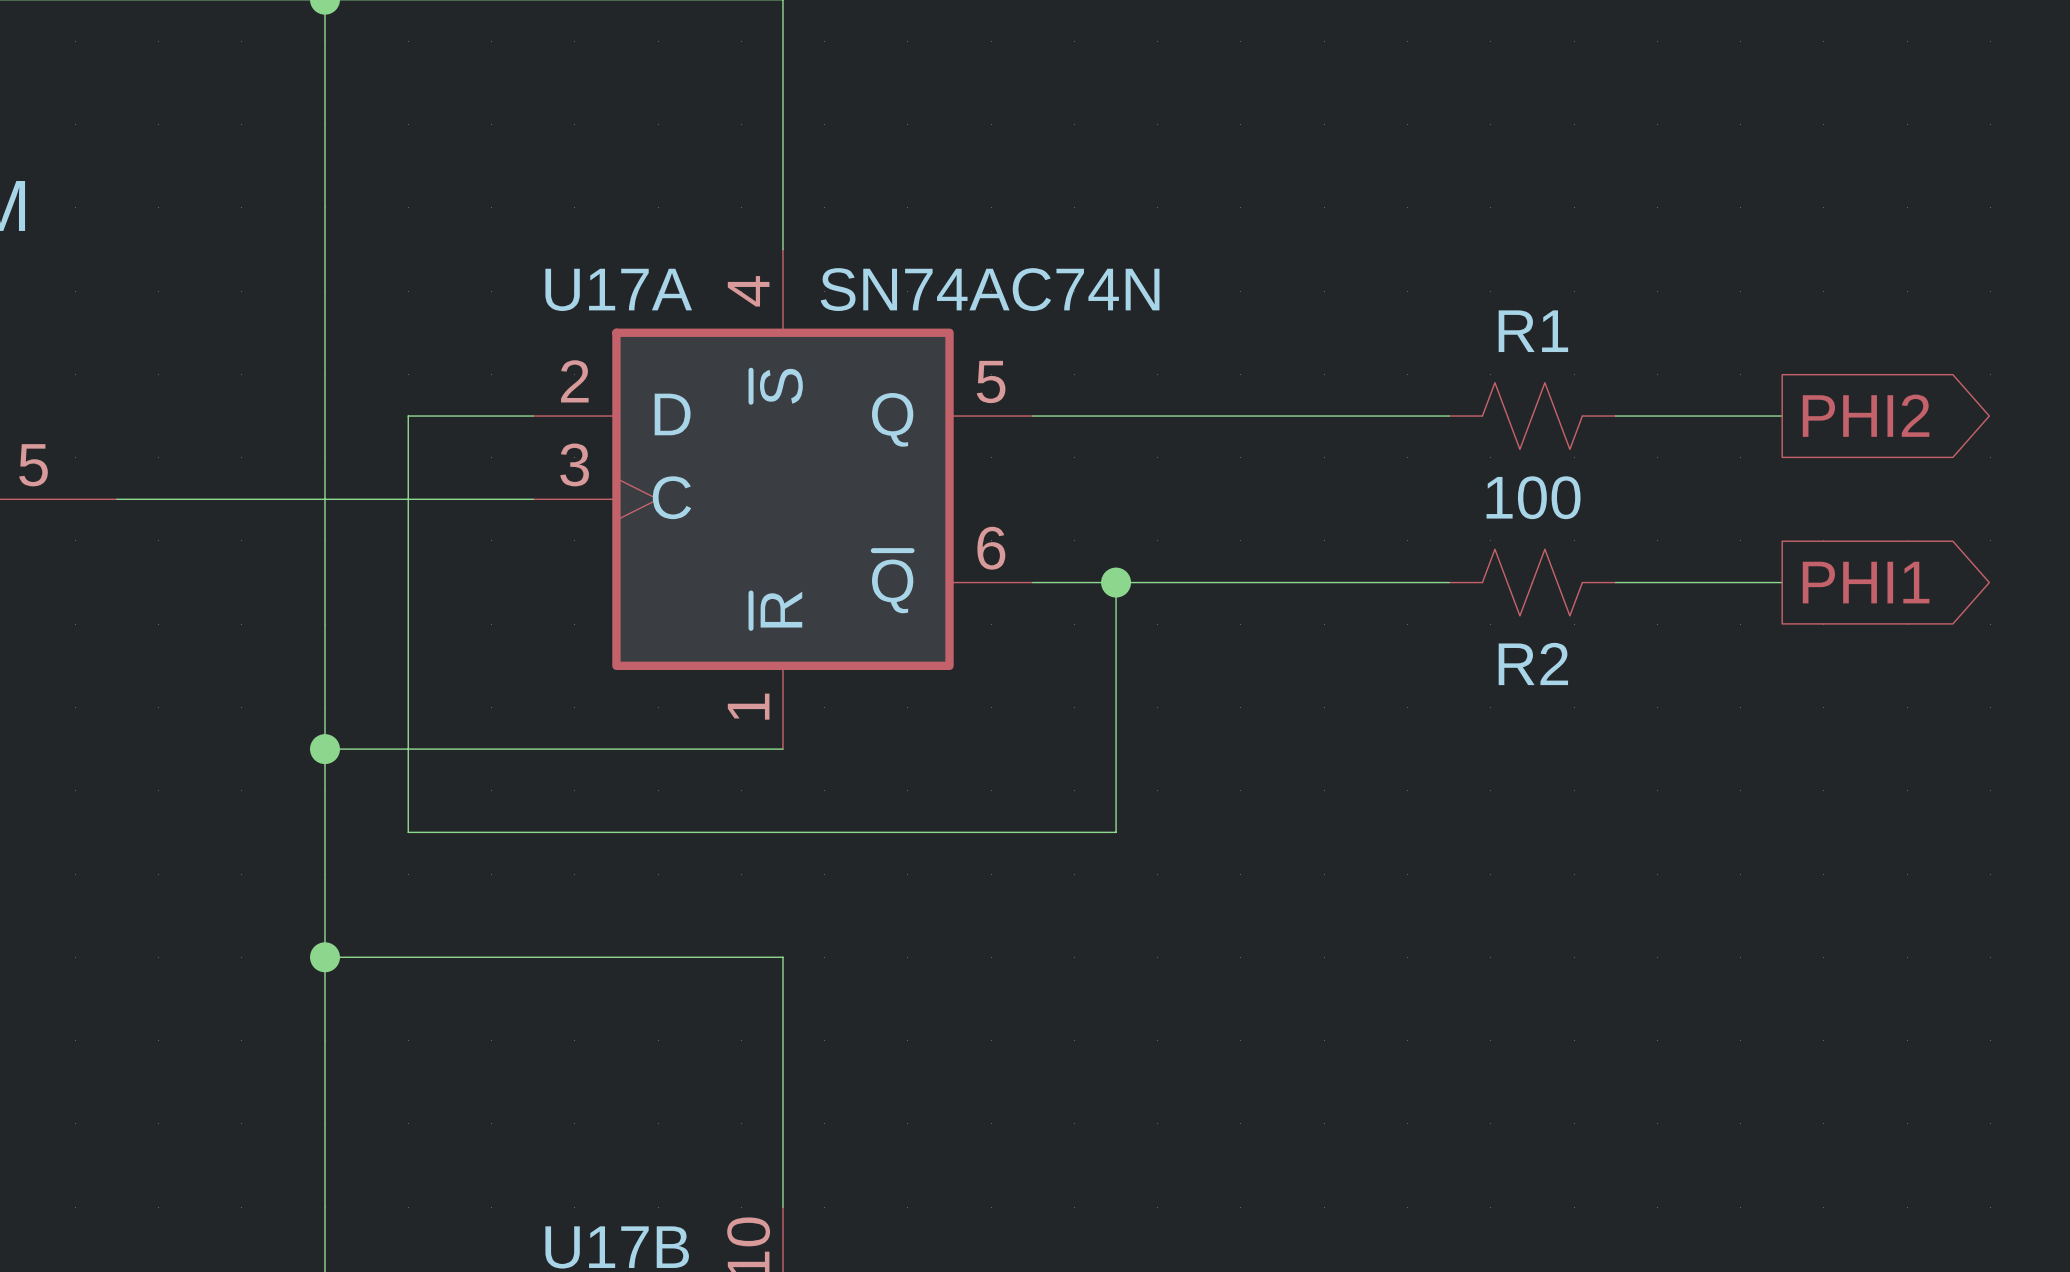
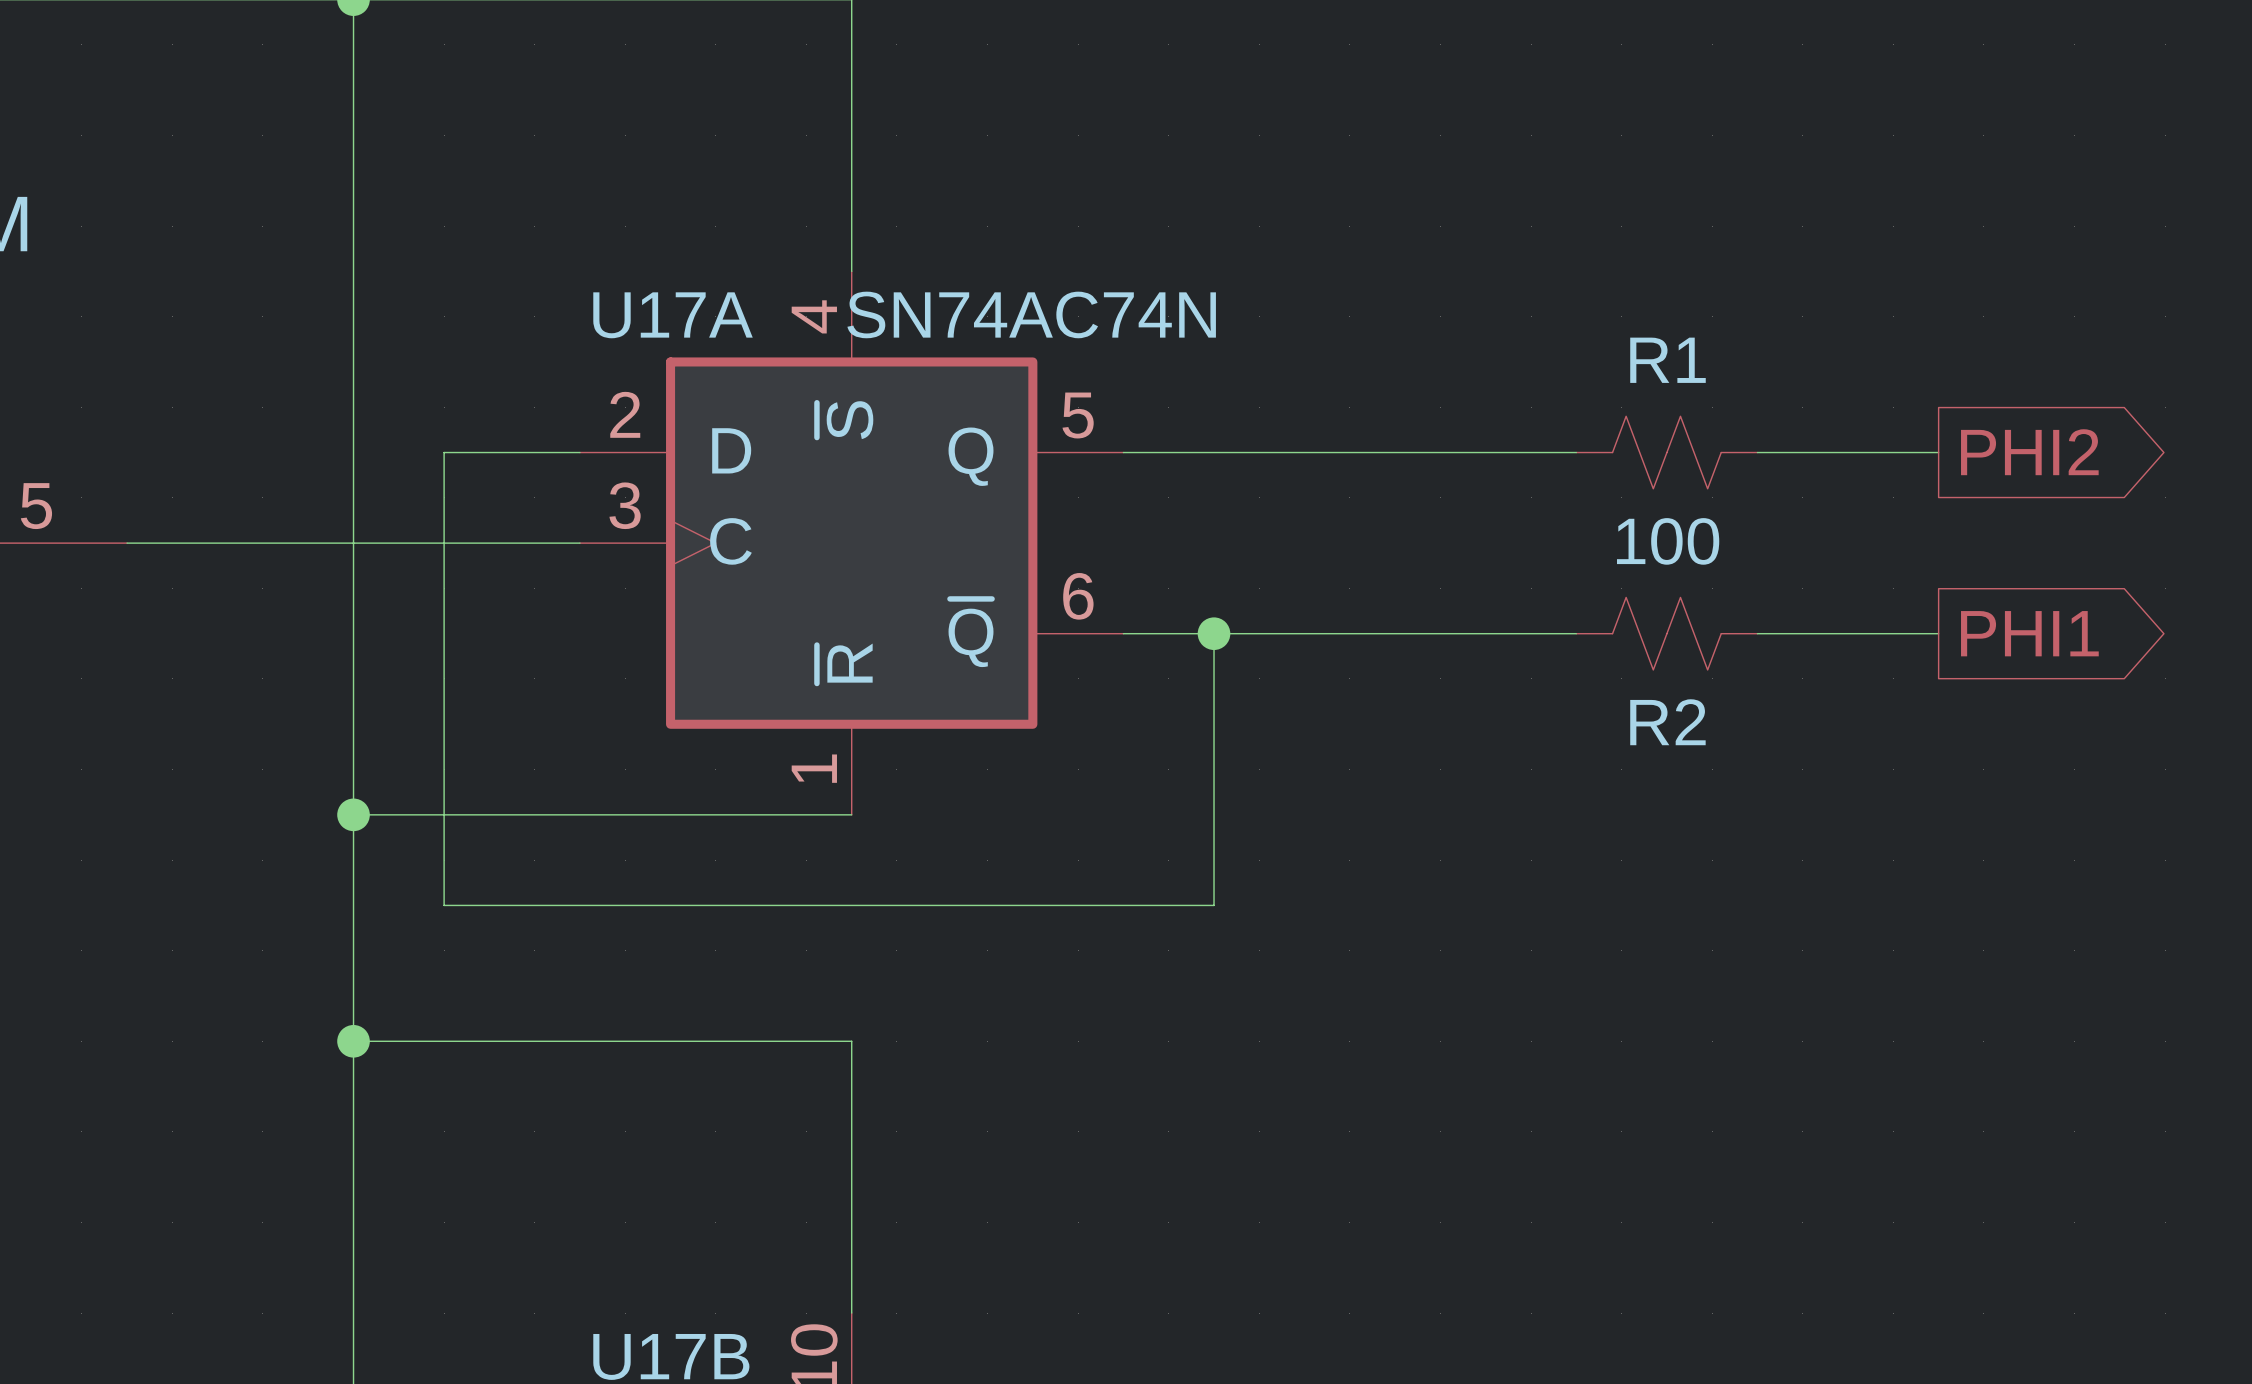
U17A value position: SN74AC74N (990, 289) -> SN74AC74N (1031, 314)

